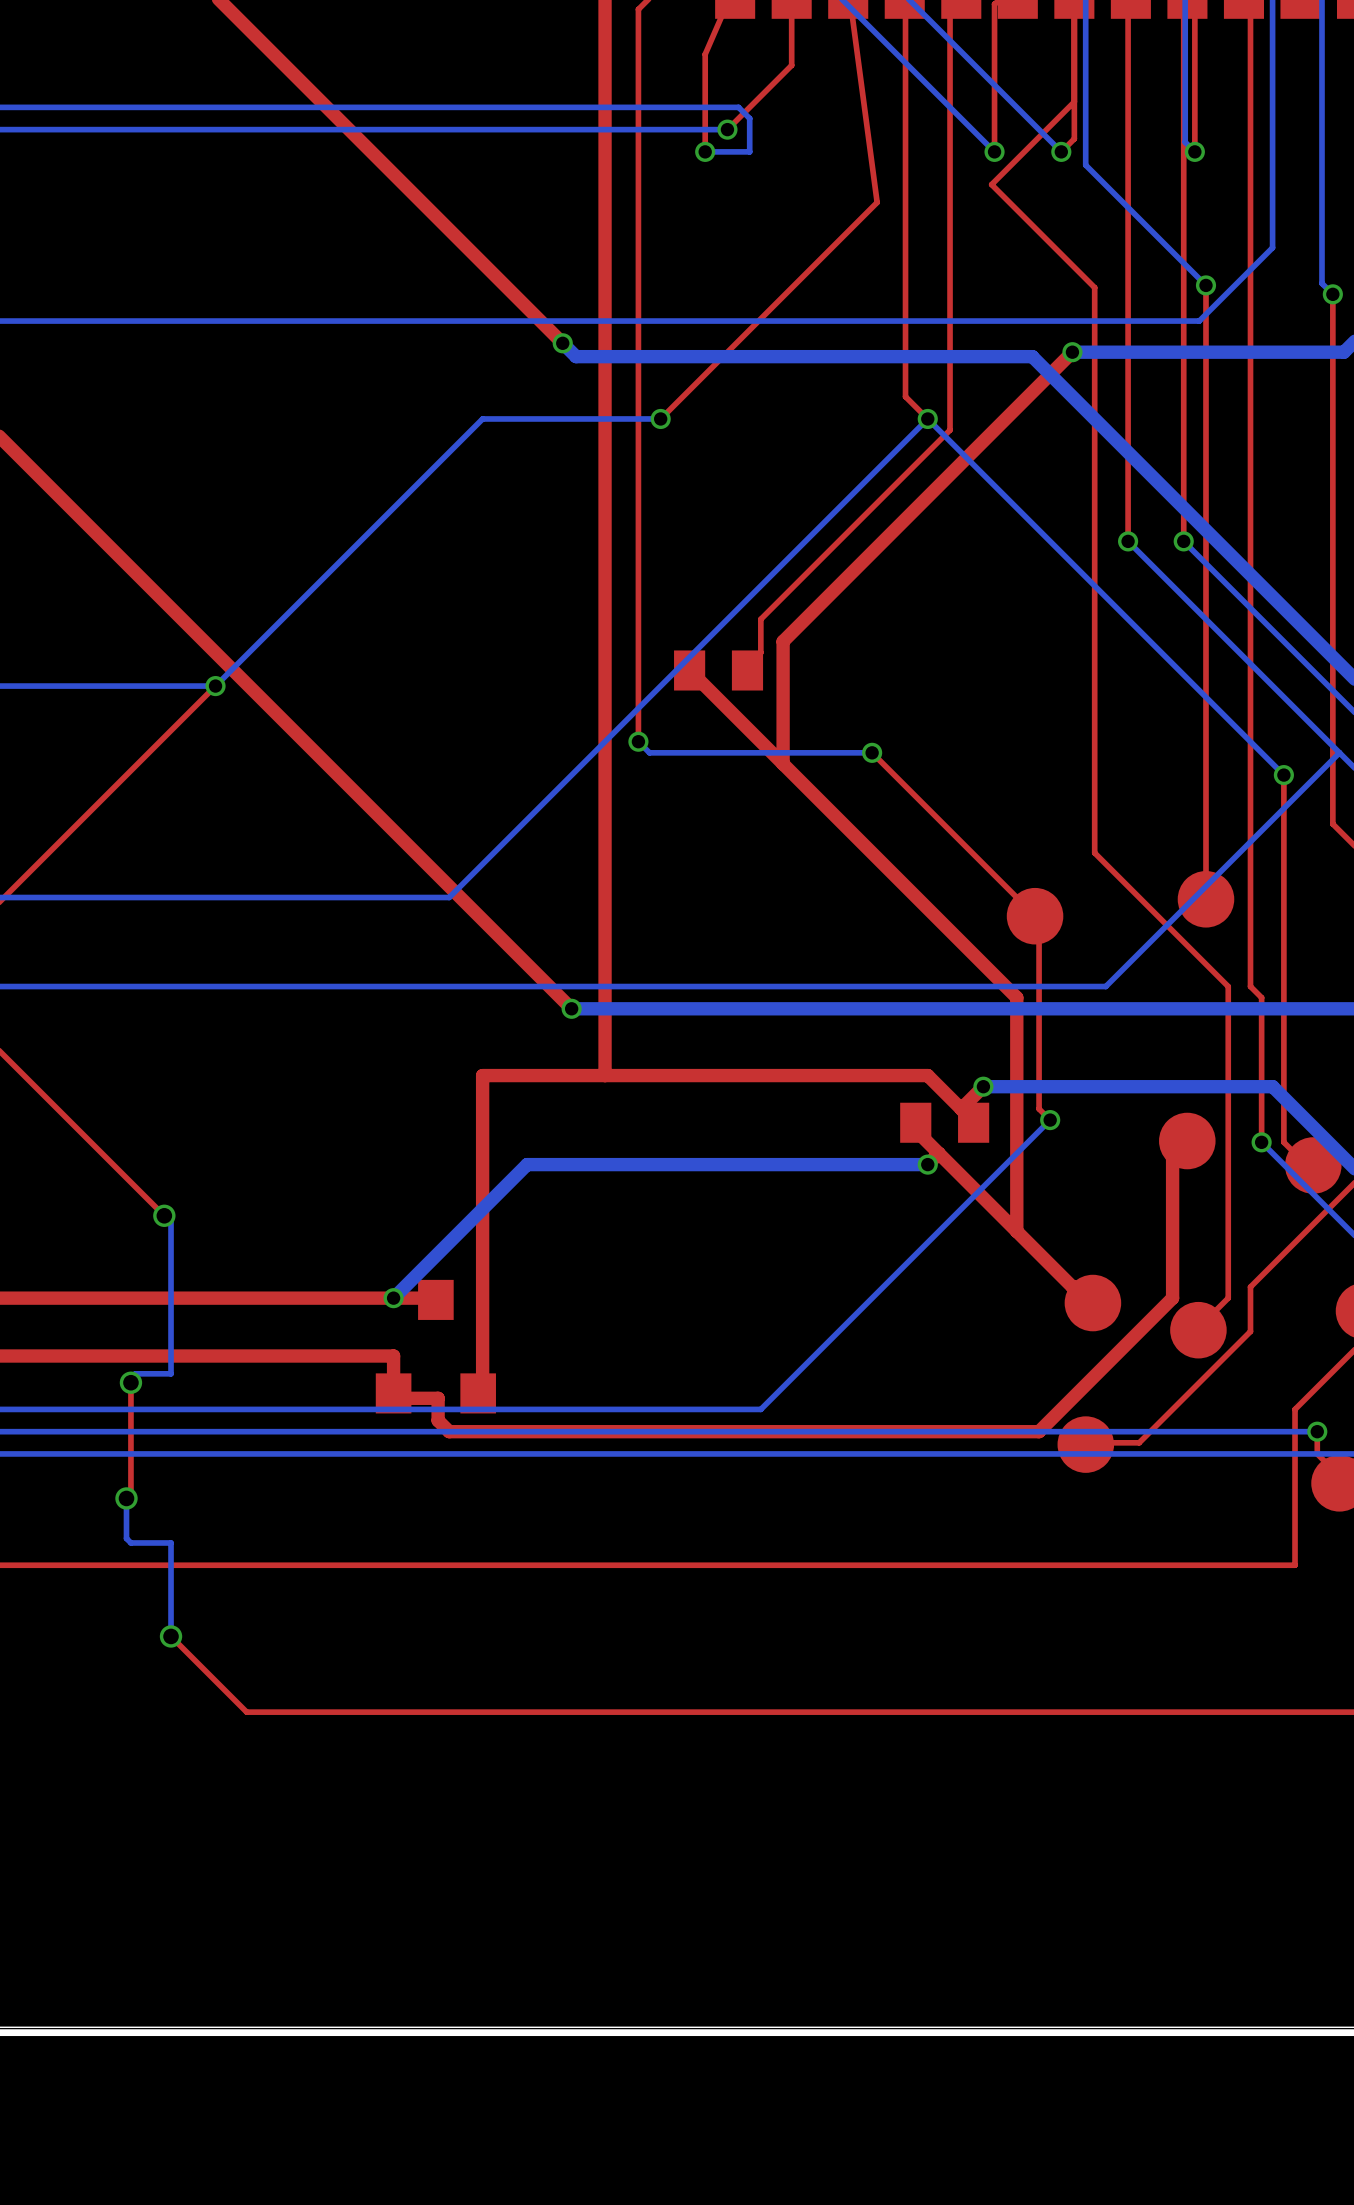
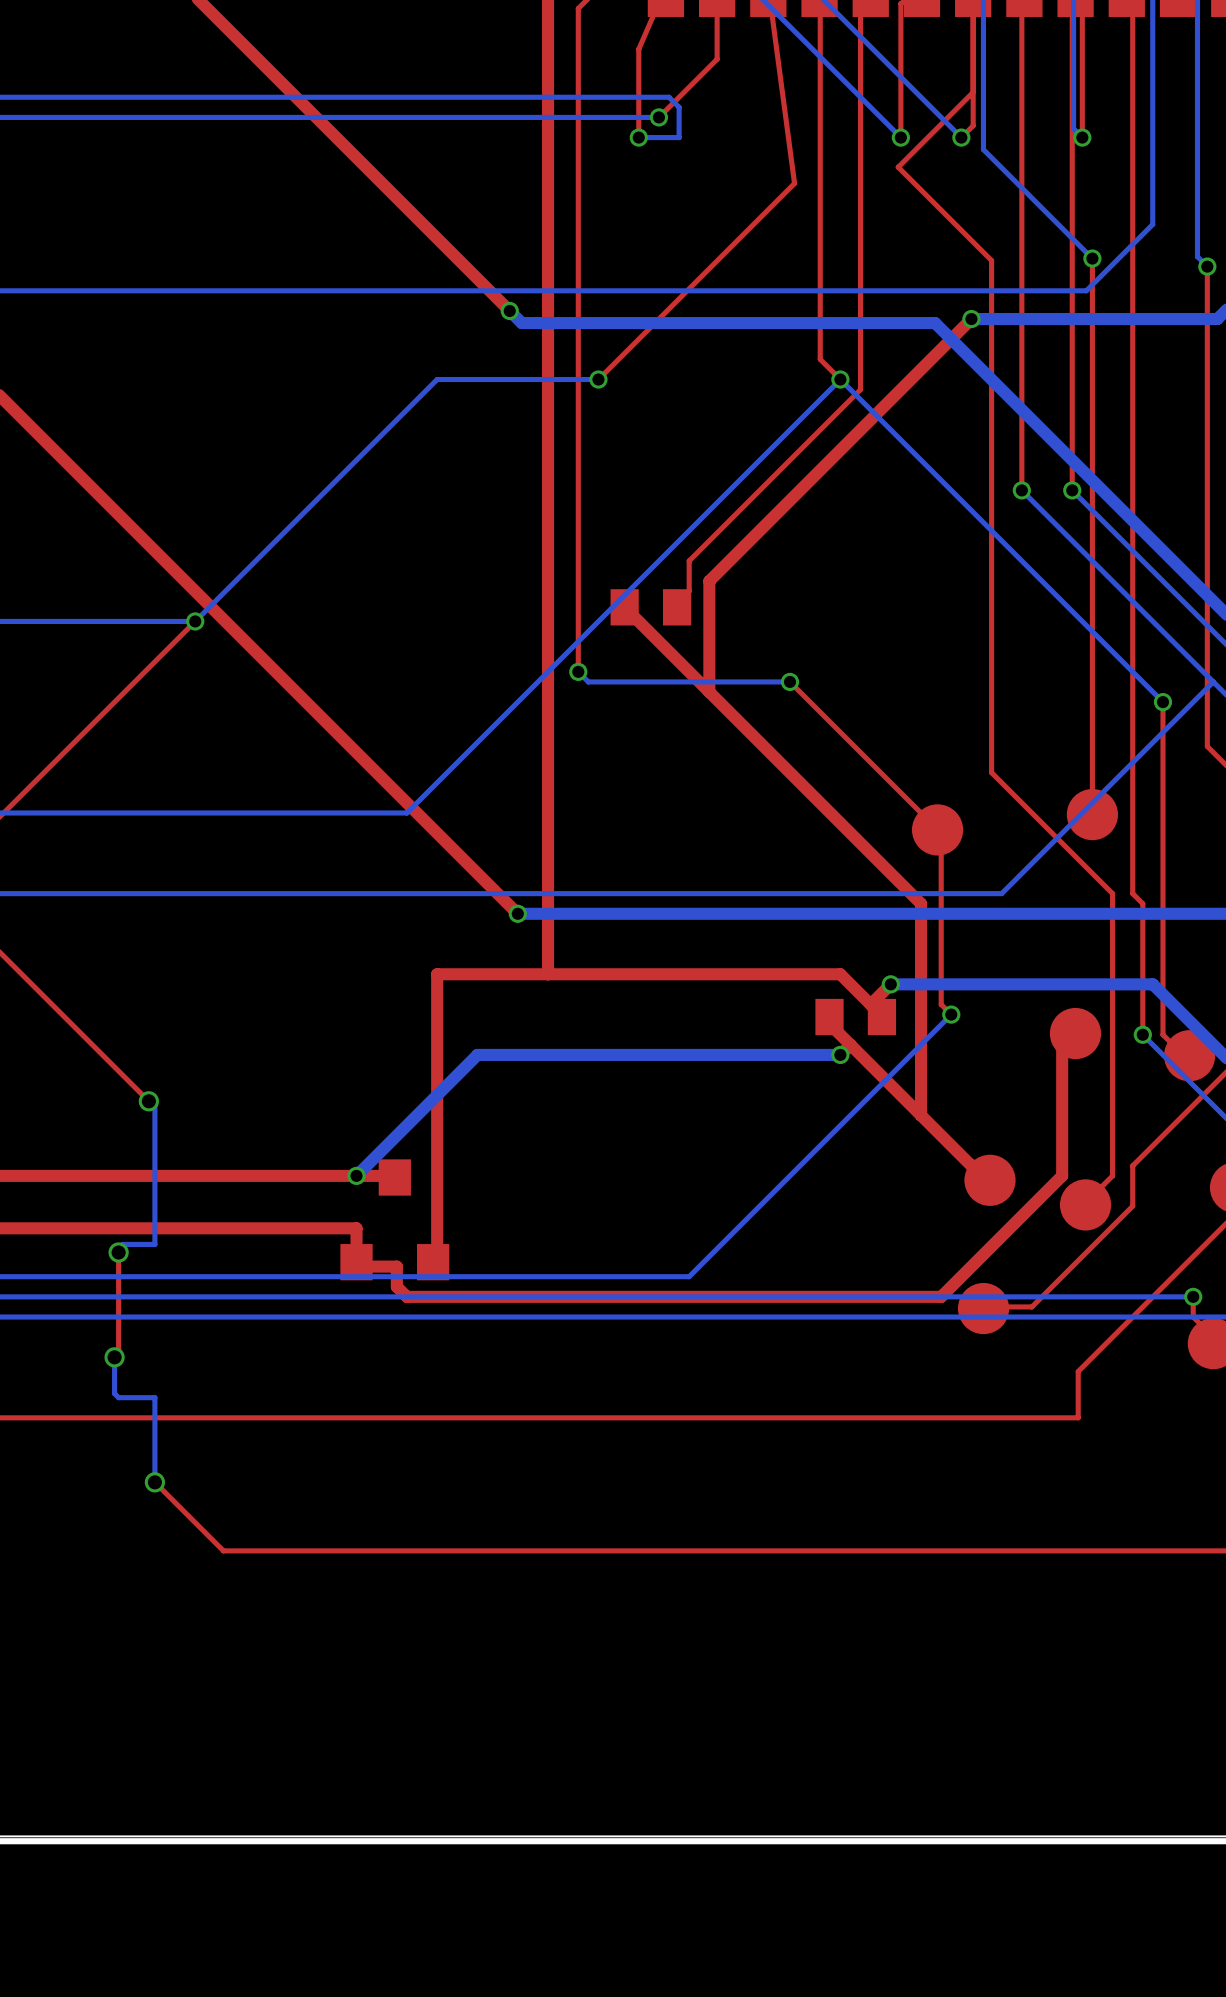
top track: (1295, 1409) (1295, 1565) (1190, 1565) -> (1173, 1276) (1078, 1371) (1078, 1417)

